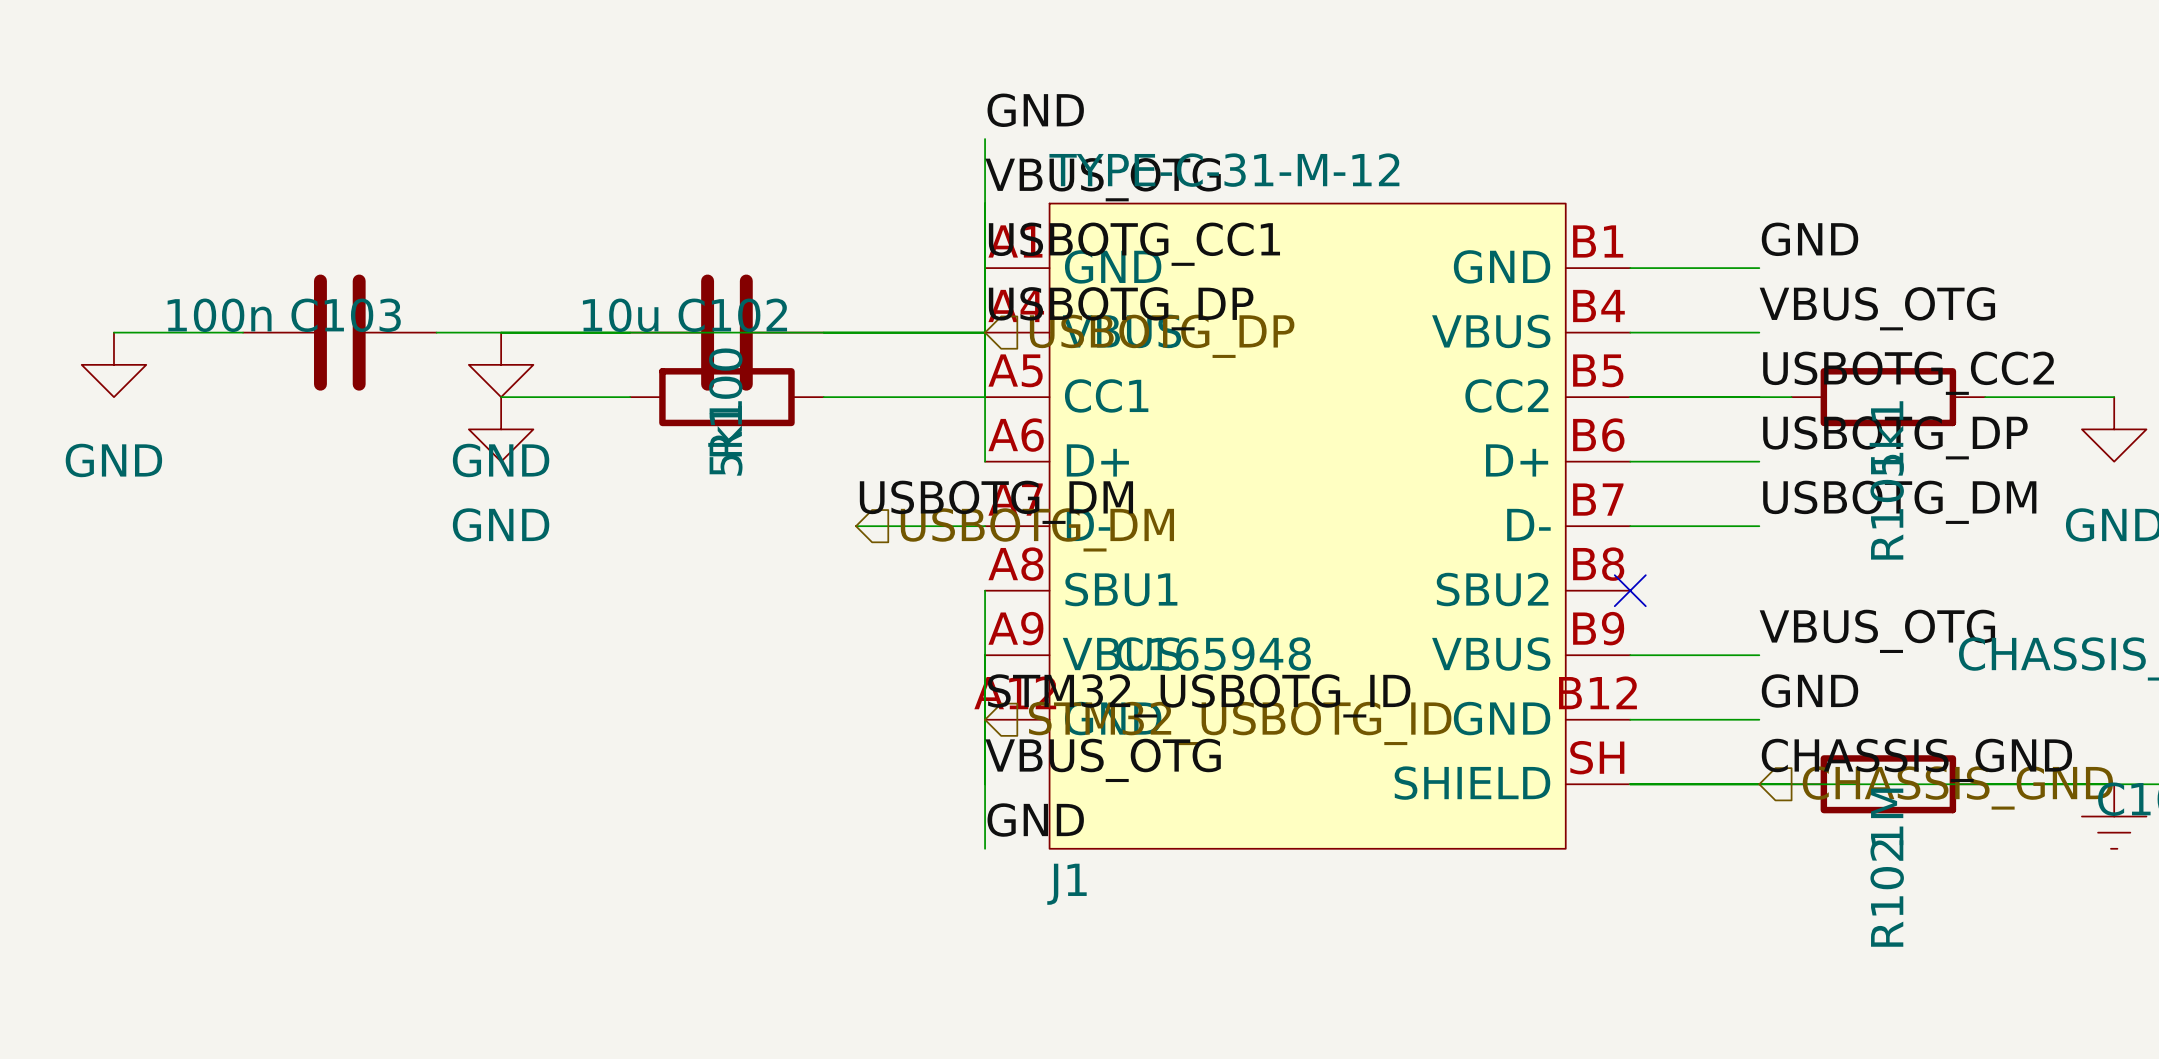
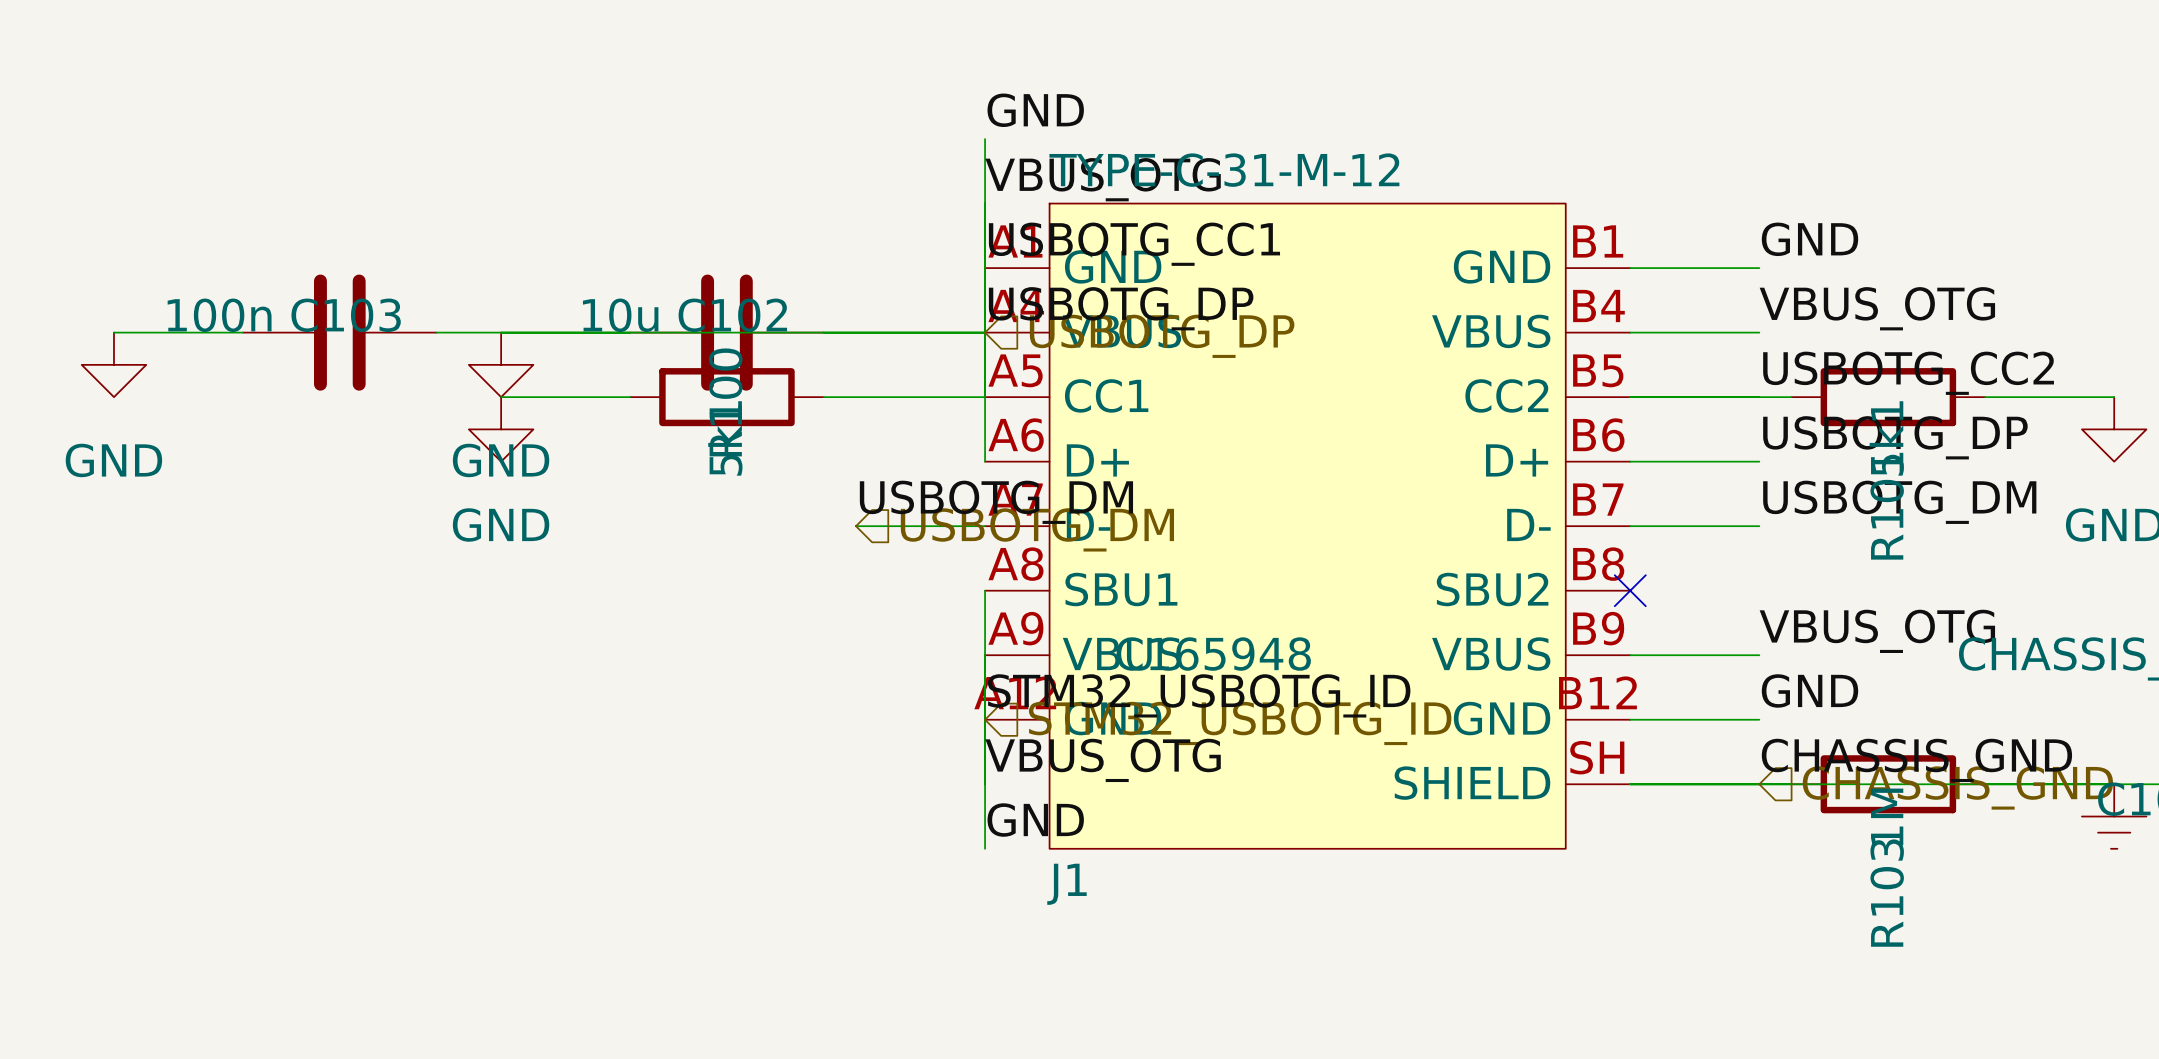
R102 name: R102 (1887, 893) -> R103 (1887, 893)

